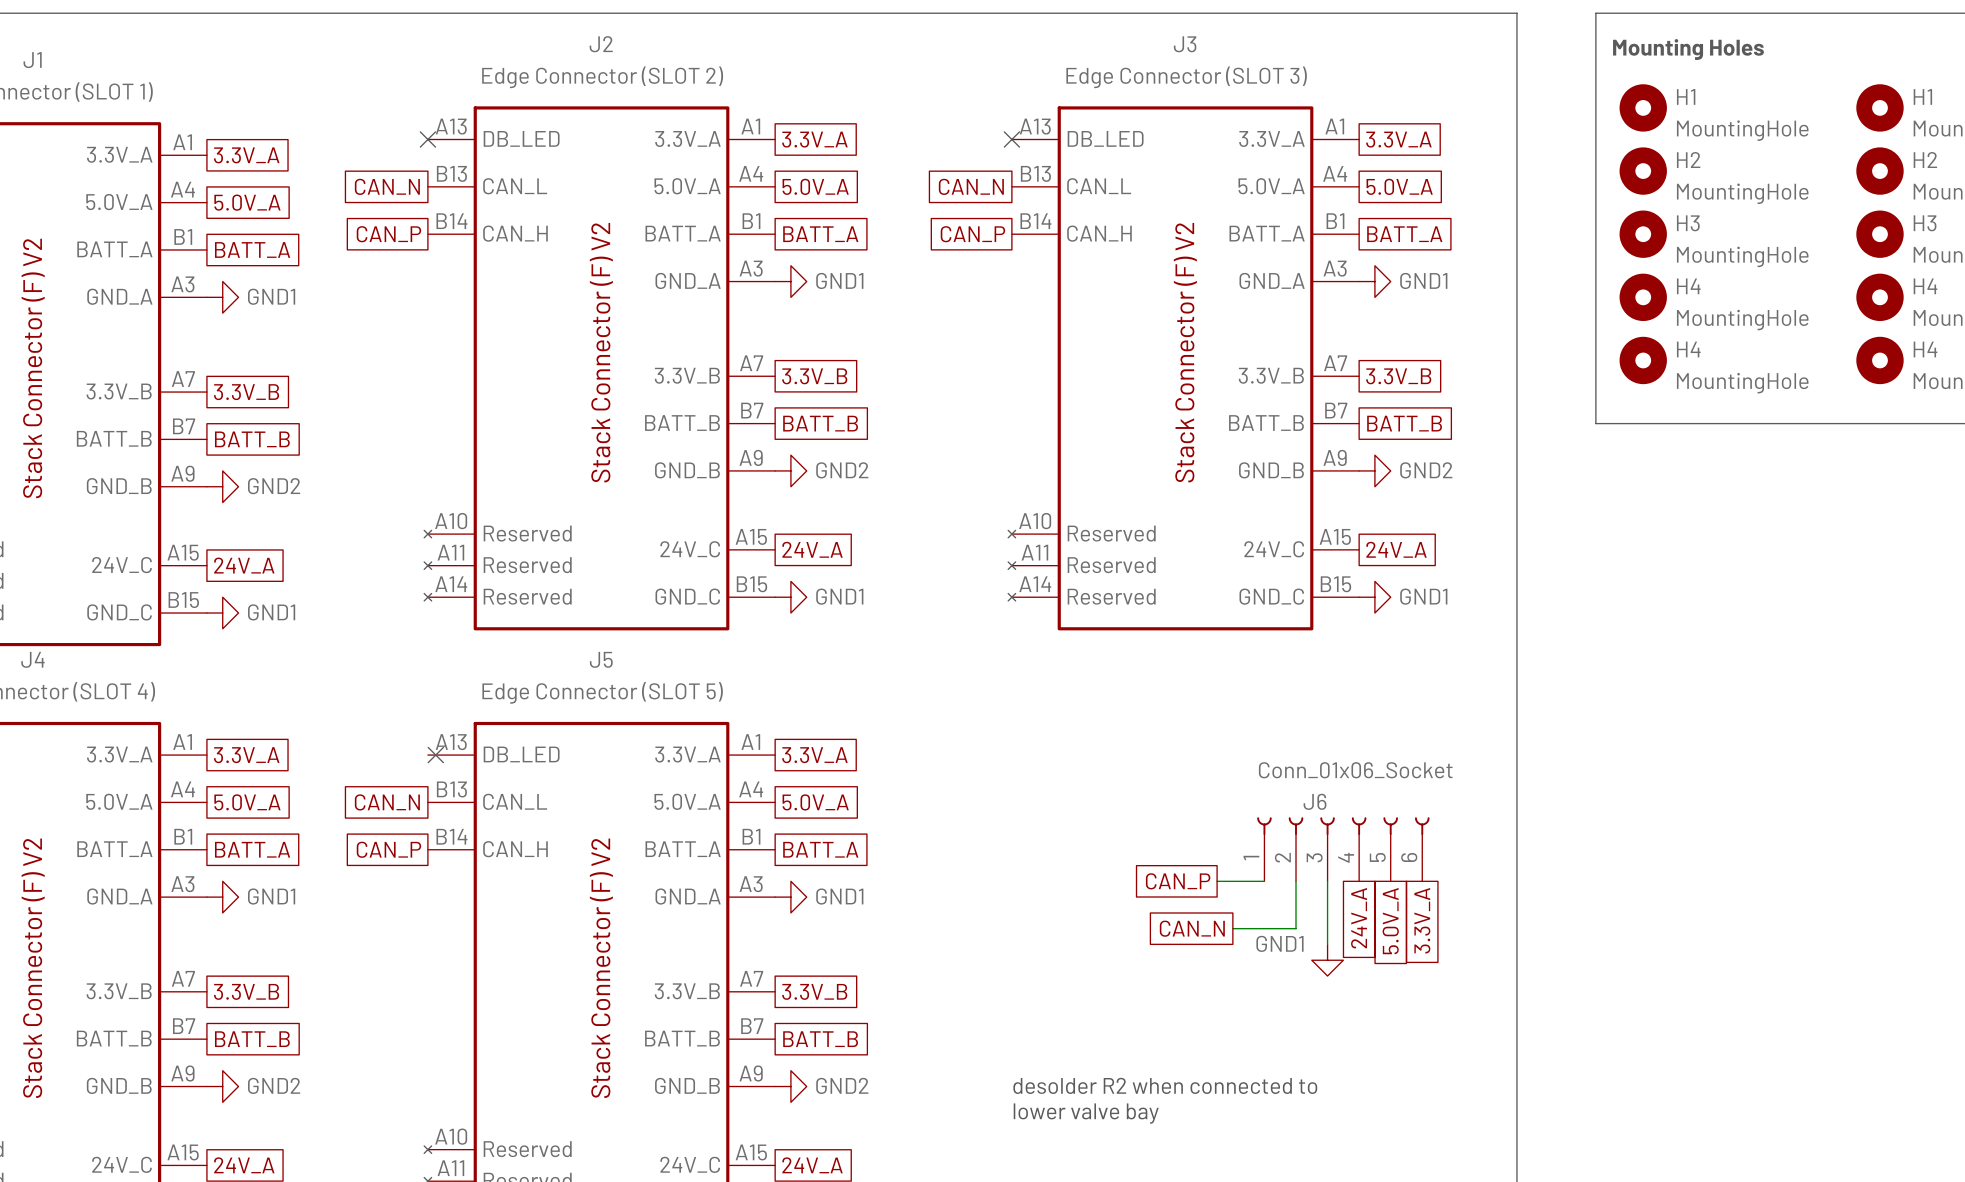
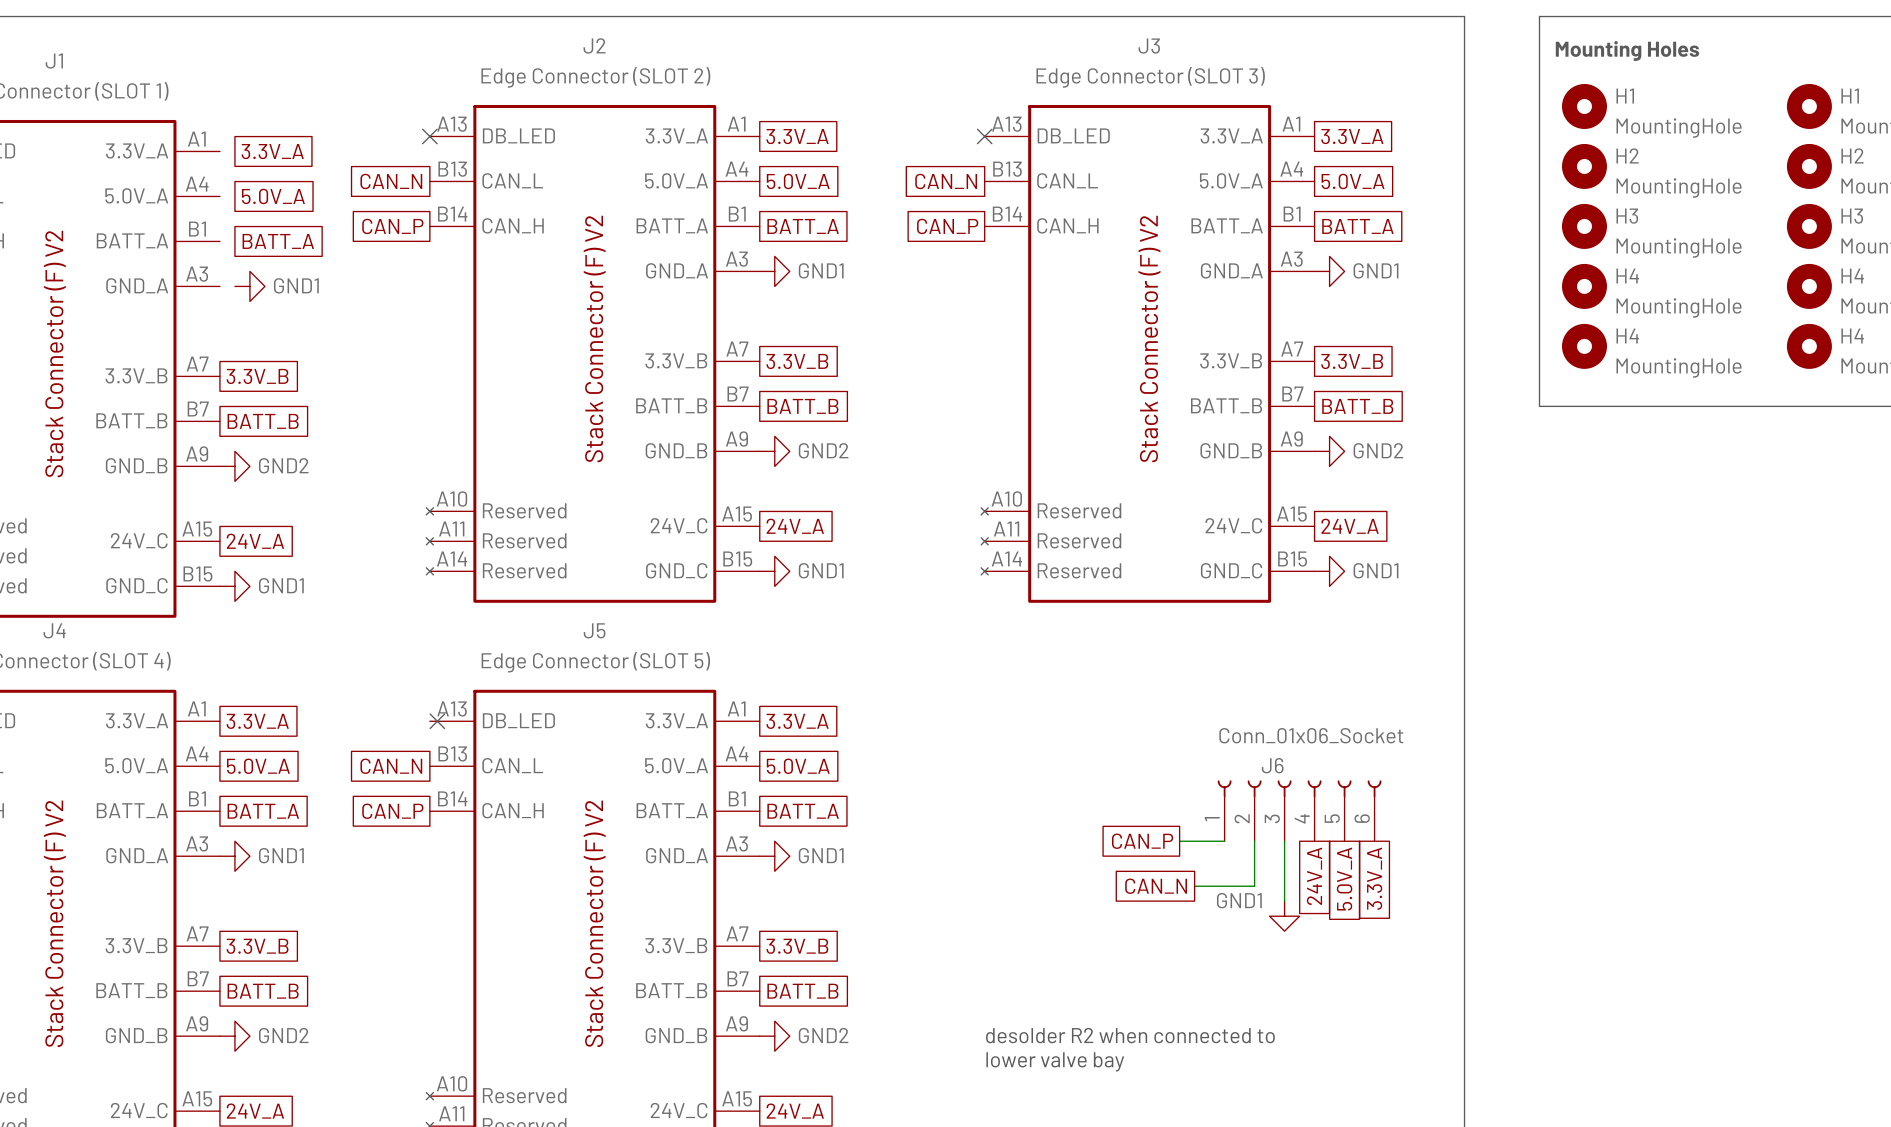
global label position: 3.3V_A (246, 155) -> 3.3V_A (272, 151)
global label position: 5.0V_A (247, 202) -> 5.0V_A (273, 196)
global label position: BATT_A (252, 249) -> BATT_A (278, 241)
power symbol position: GND1 (222, 297) -> GND1 (249, 286)

